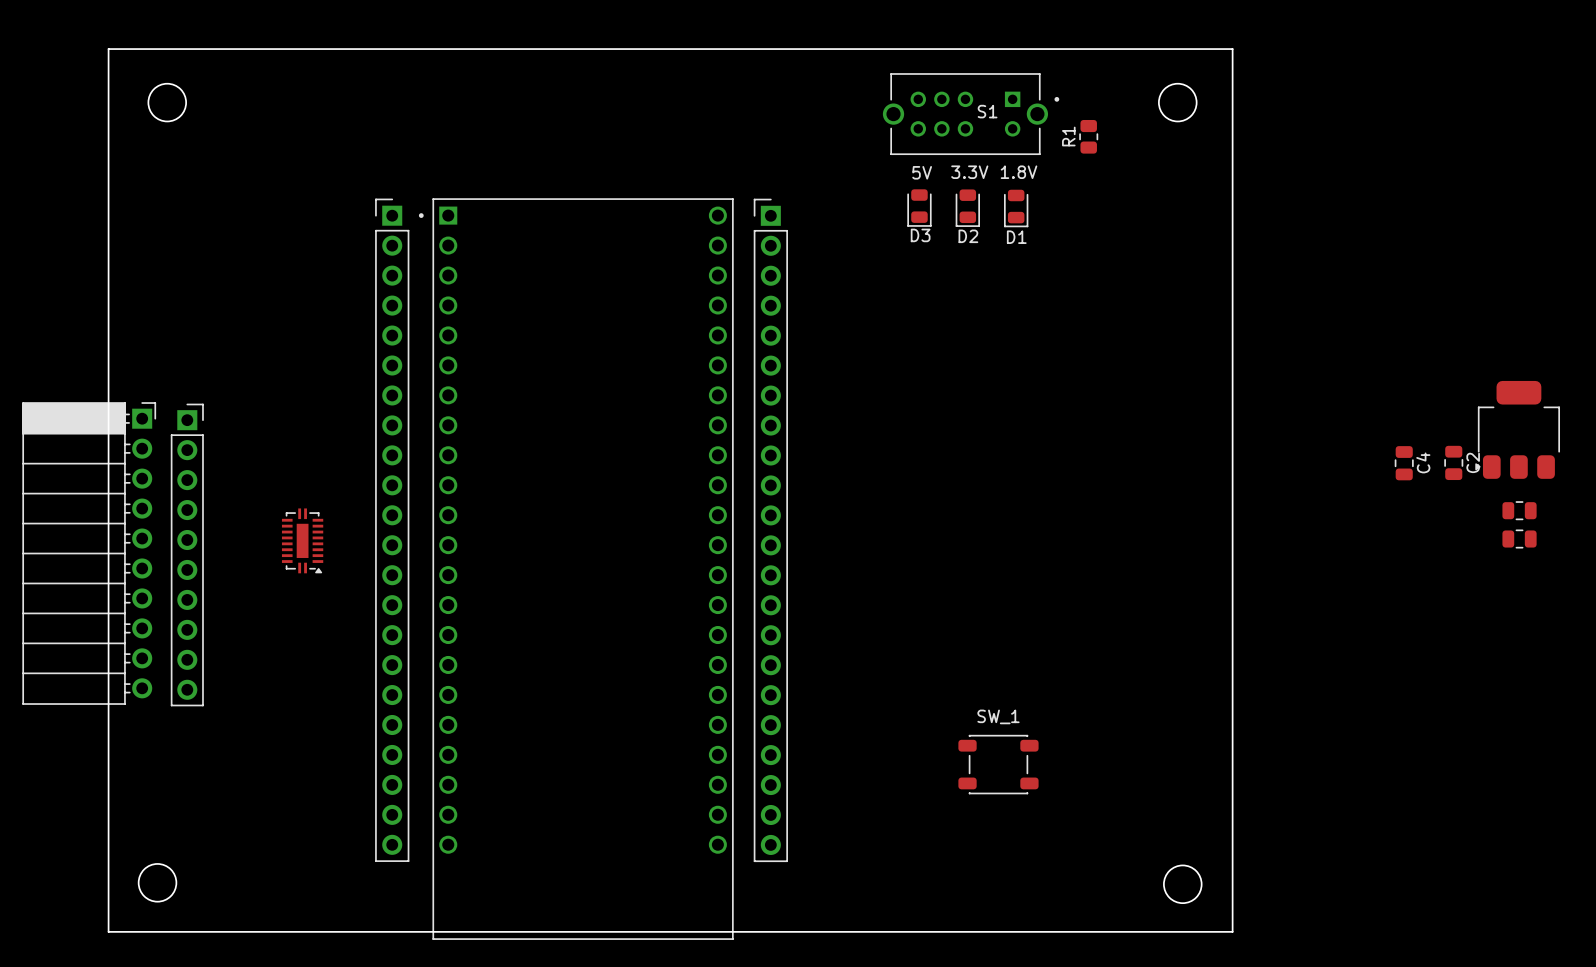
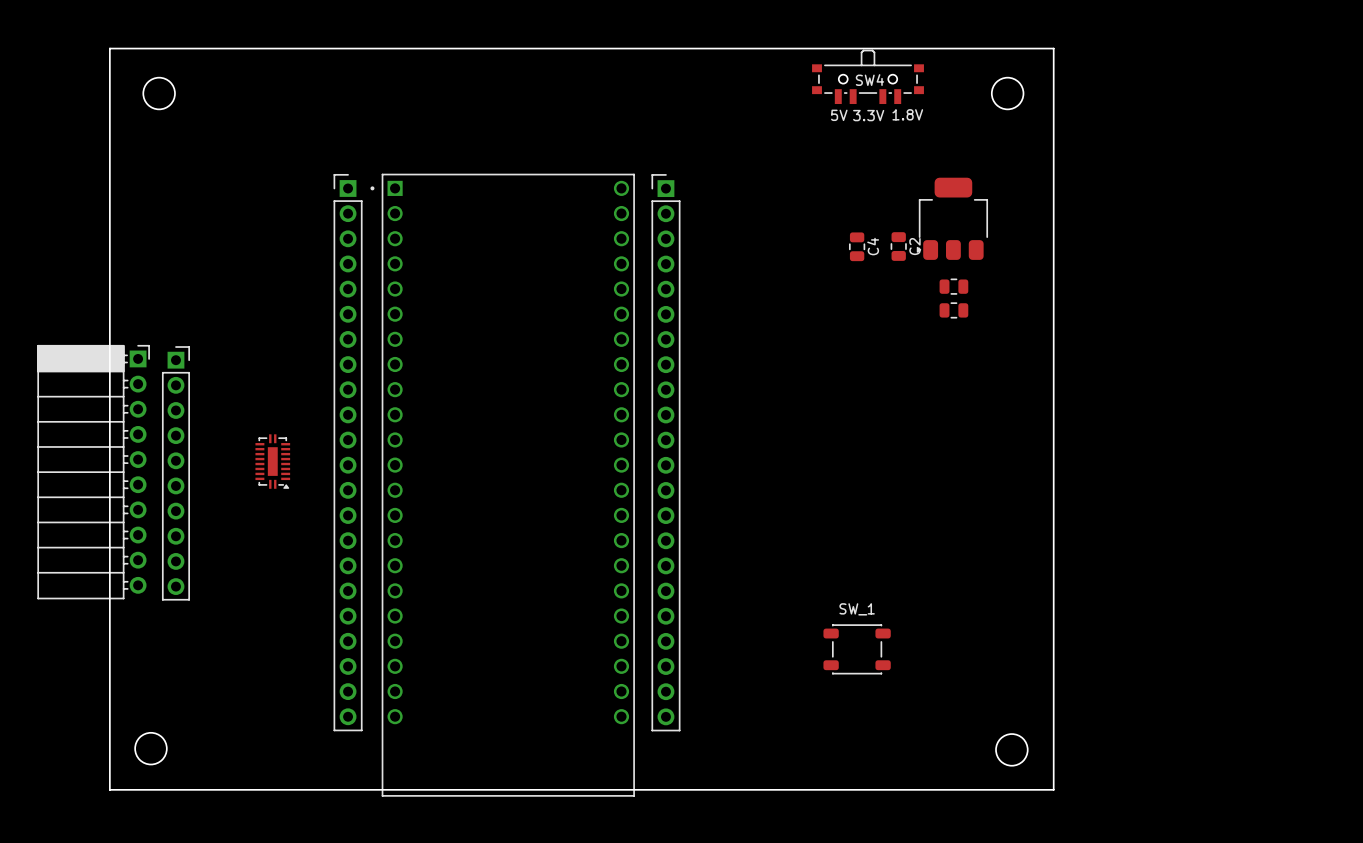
SW4: none -> (868, 76)
S1: (971, 114) -> none
R1: (1088, 136) -> none
text position: 5V (922, 172) -> 5V (839, 115)
text position: 3.3V (969, 172) -> 3.3V (868, 115)
text position: 1.8V (1019, 172) -> 1.8V (907, 114)
D3: (919, 207) -> none
D2: (967, 208) -> none
D1: (1016, 208) -> none
part: none -> (952, 218)
part: none -> (953, 286)
part: none -> (953, 310)
part: (1517, 429) -> none
C2 position: (1453, 462) -> (898, 246)
C4 position: (1404, 463) -> (857, 246)
part: (1519, 510) -> none
part: (1519, 539) -> none

